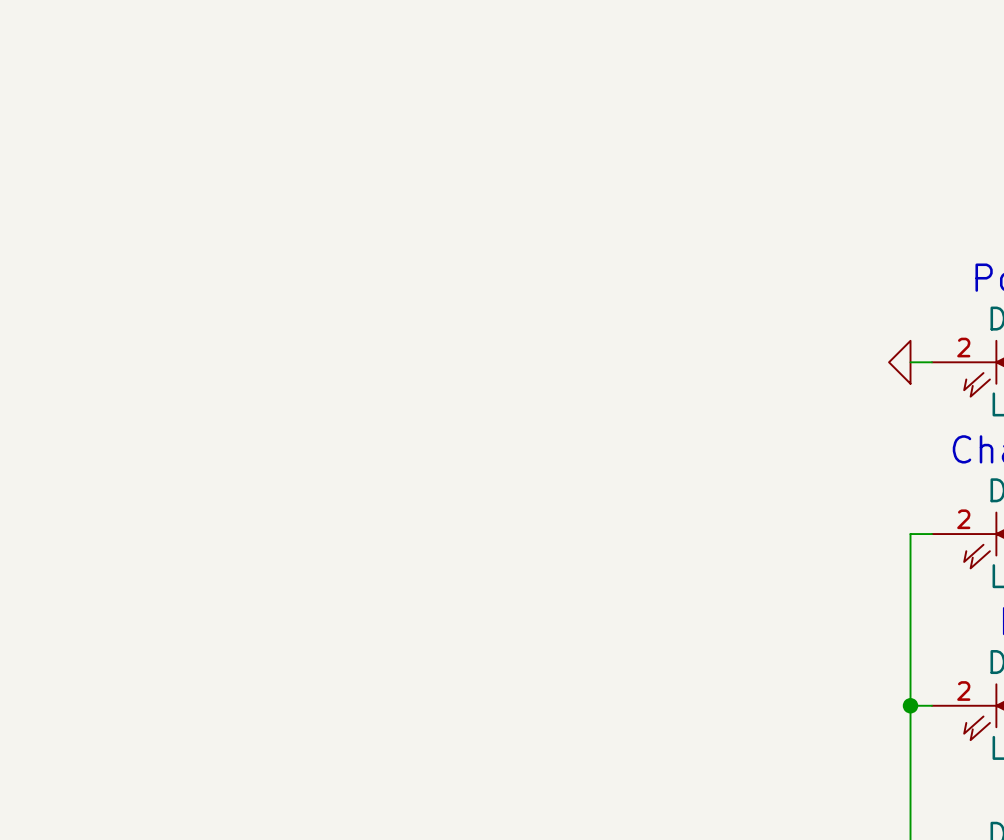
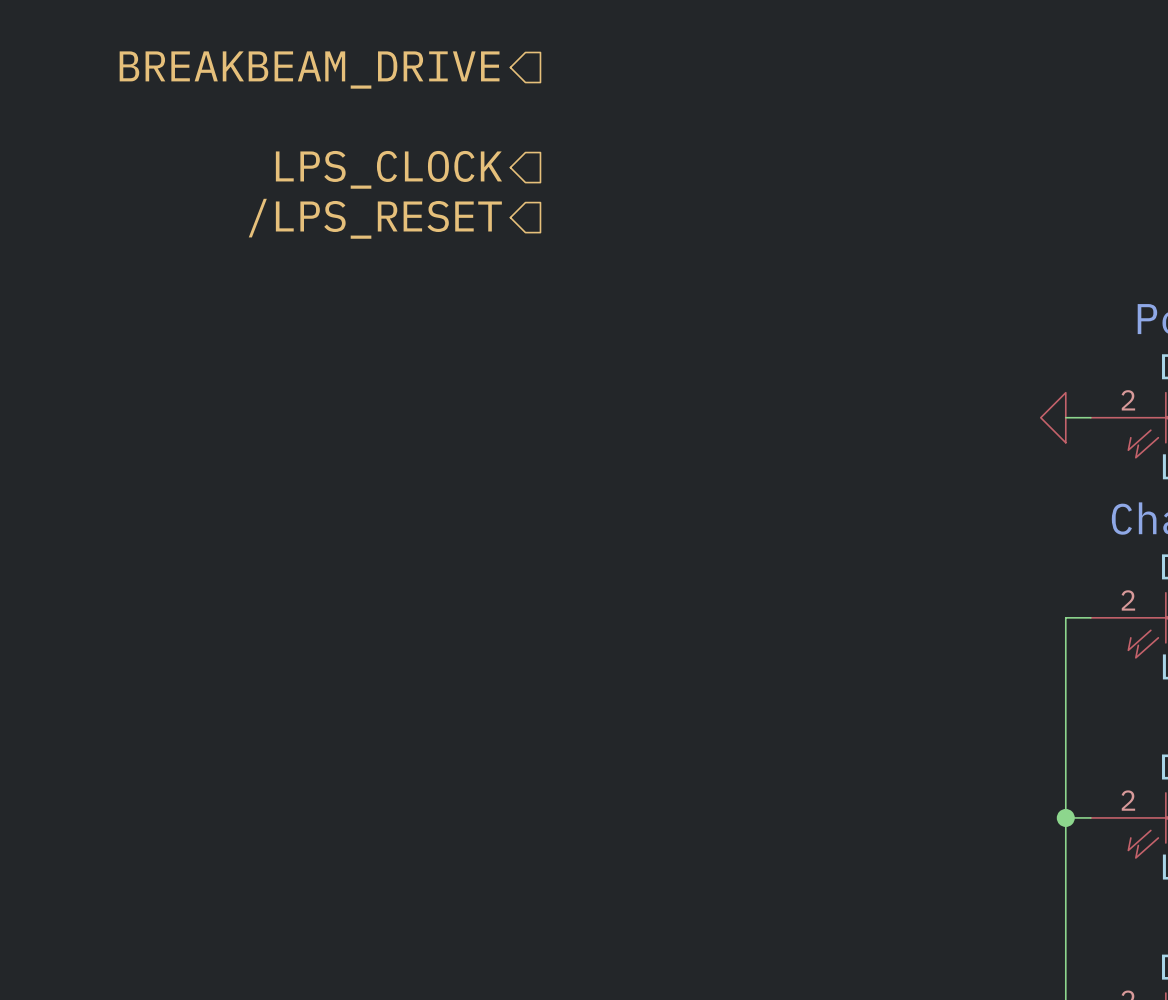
hierarchical label: none -> BREAKBEAM_DRIVE (309, 70)
hierarchical label: none -> LPS_CLOCK (388, 169)
hierarchical label: none -> /LPS_RESET (375, 218)

